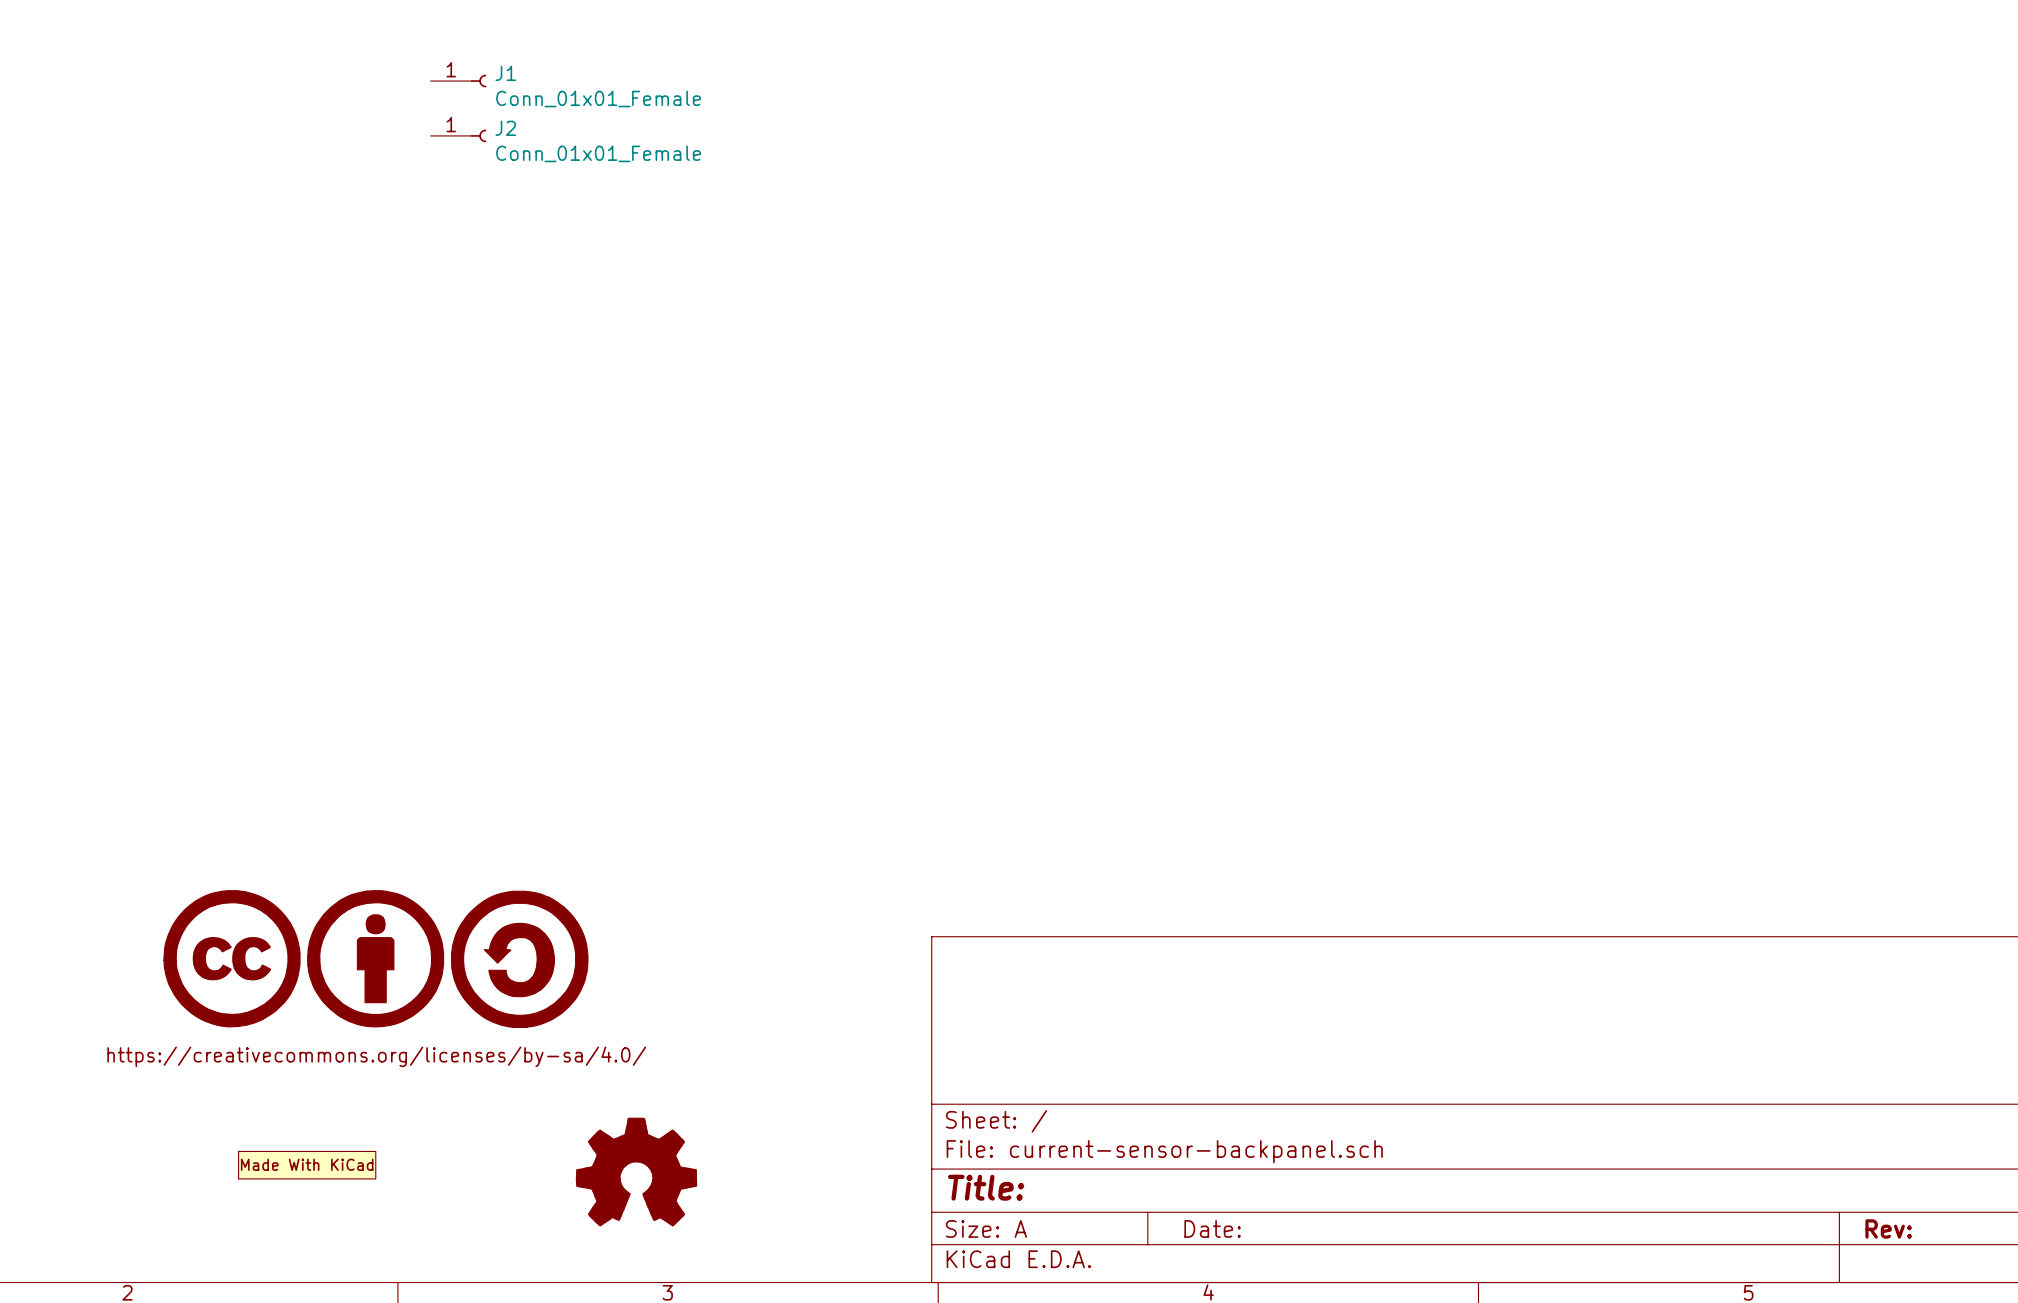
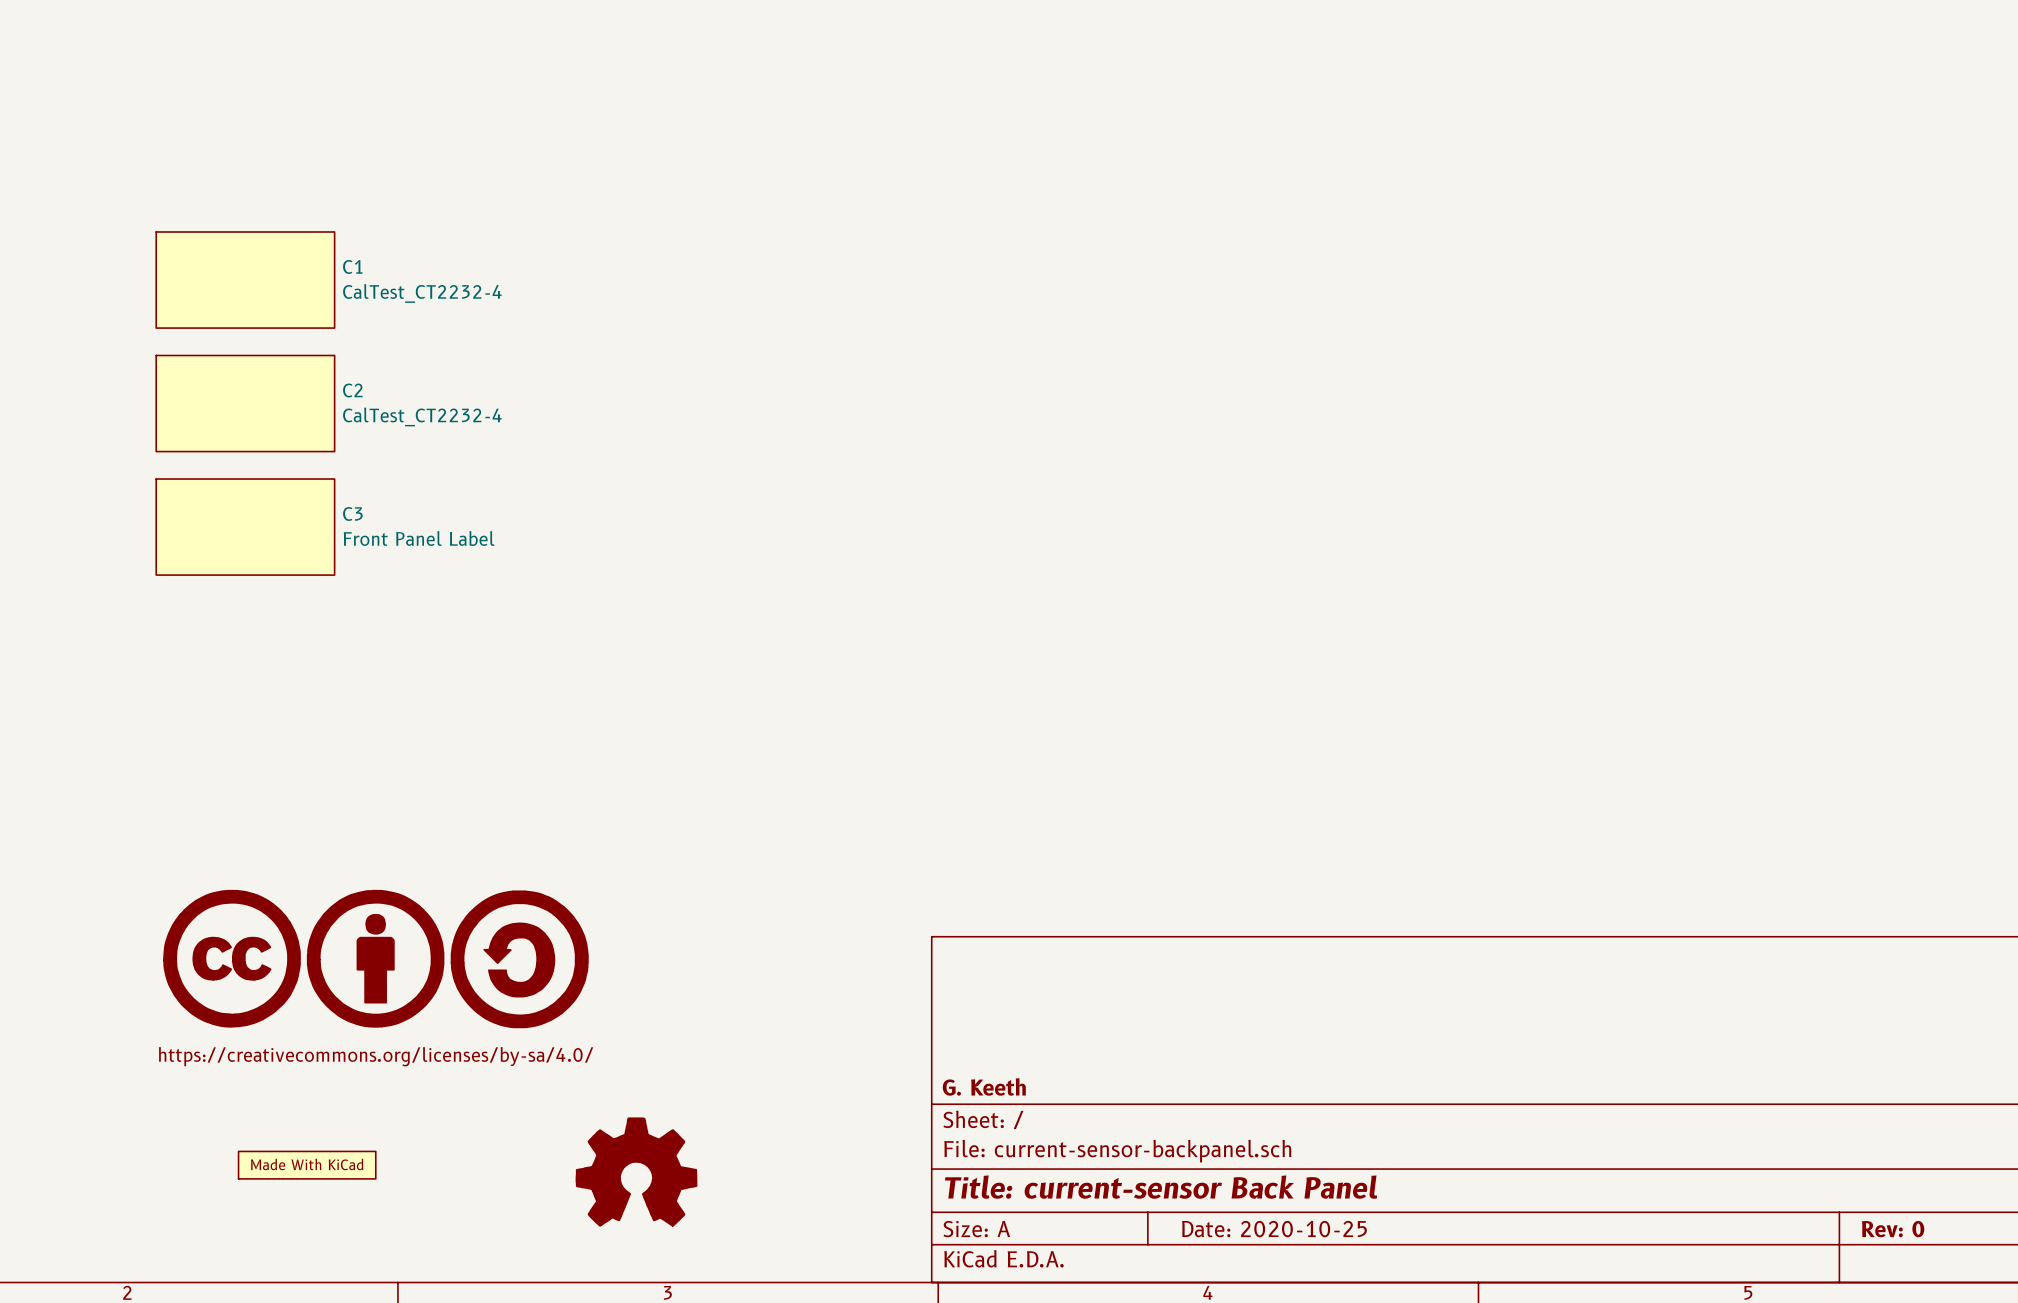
J1: Conn_01x01_Female (458, 81) -> none
J2: Conn_01x01_Female (458, 135) -> none
C1: none -> CalTest_CT2232-4 (245, 280)
C2: none -> CalTest_CT2232-4 (245, 403)
C3: none -> Front Panel Label (245, 527)
title block: none -> G. Keeth (984, 1086)
title block: Title: (986, 1187) -> Title: current-sensor Back Panel (1161, 1187)
title block: Date: (1212, 1228) -> Date: 2020-10-25 (1274, 1229)
title block: Rev: (1888, 1228) -> Rev: 0 (1893, 1229)

